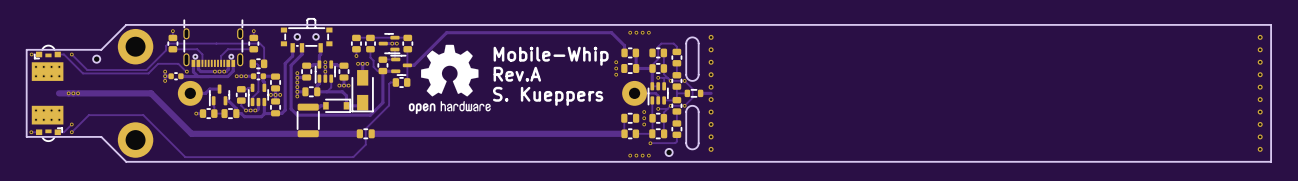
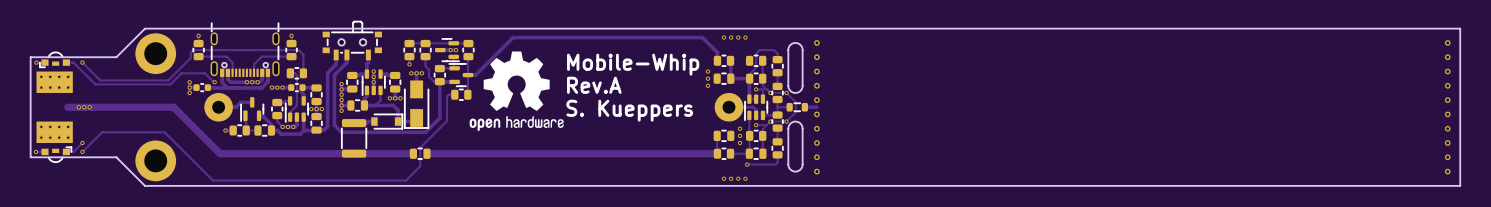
part: (96, 59) -> none
part: (669, 152) -> none

